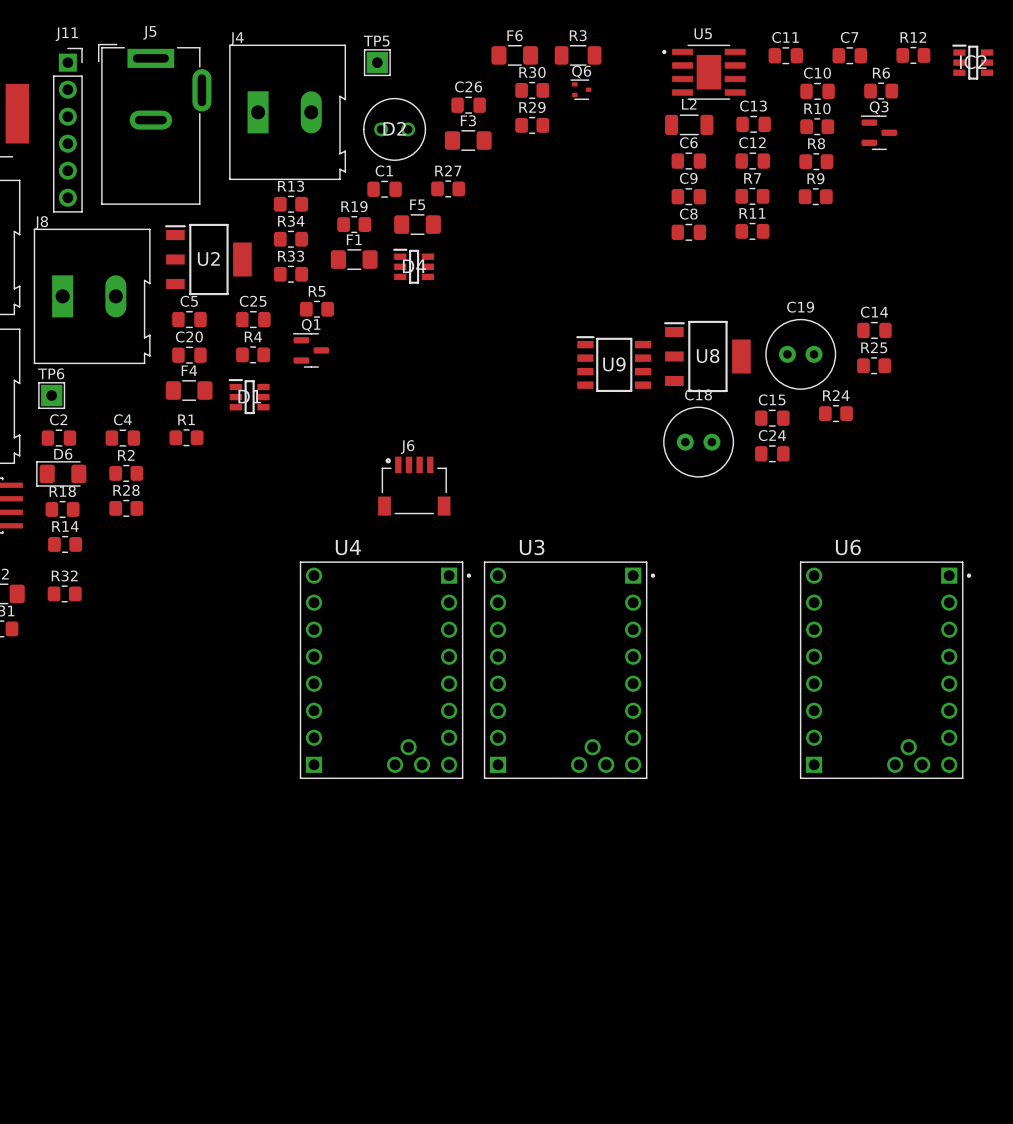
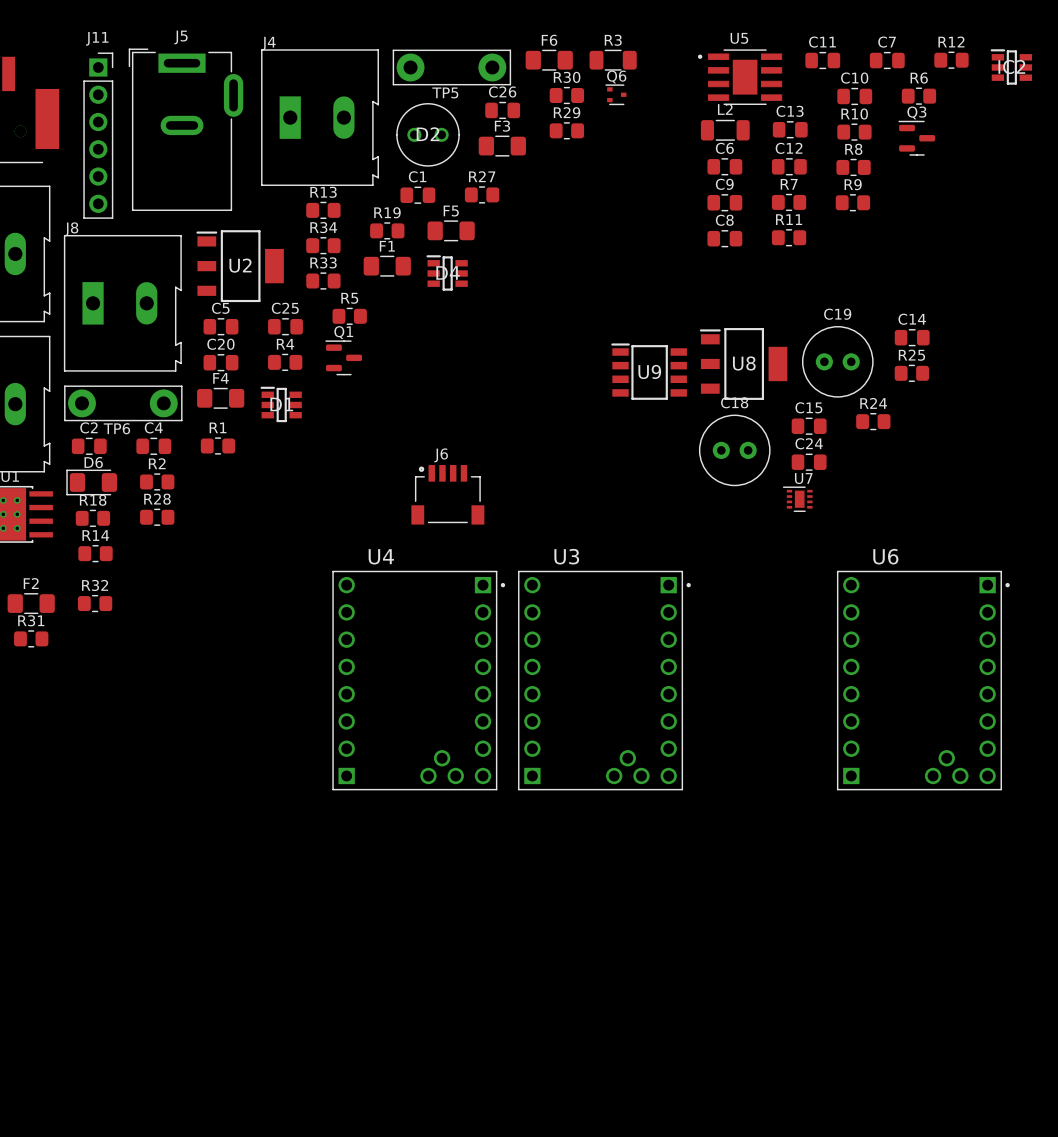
TP5 name position: TP5 (376, 41) -> TP5 (445, 92)
TP5 footprint: [363, 49, 391, 77] -> [392, 49, 512, 86]
TP6 name position: TP6 (51, 373) -> TP6 (116, 428)
TP6 footprint: [38, 382, 66, 409] -> [64, 385, 183, 422]
U7: none -> (797, 499)

